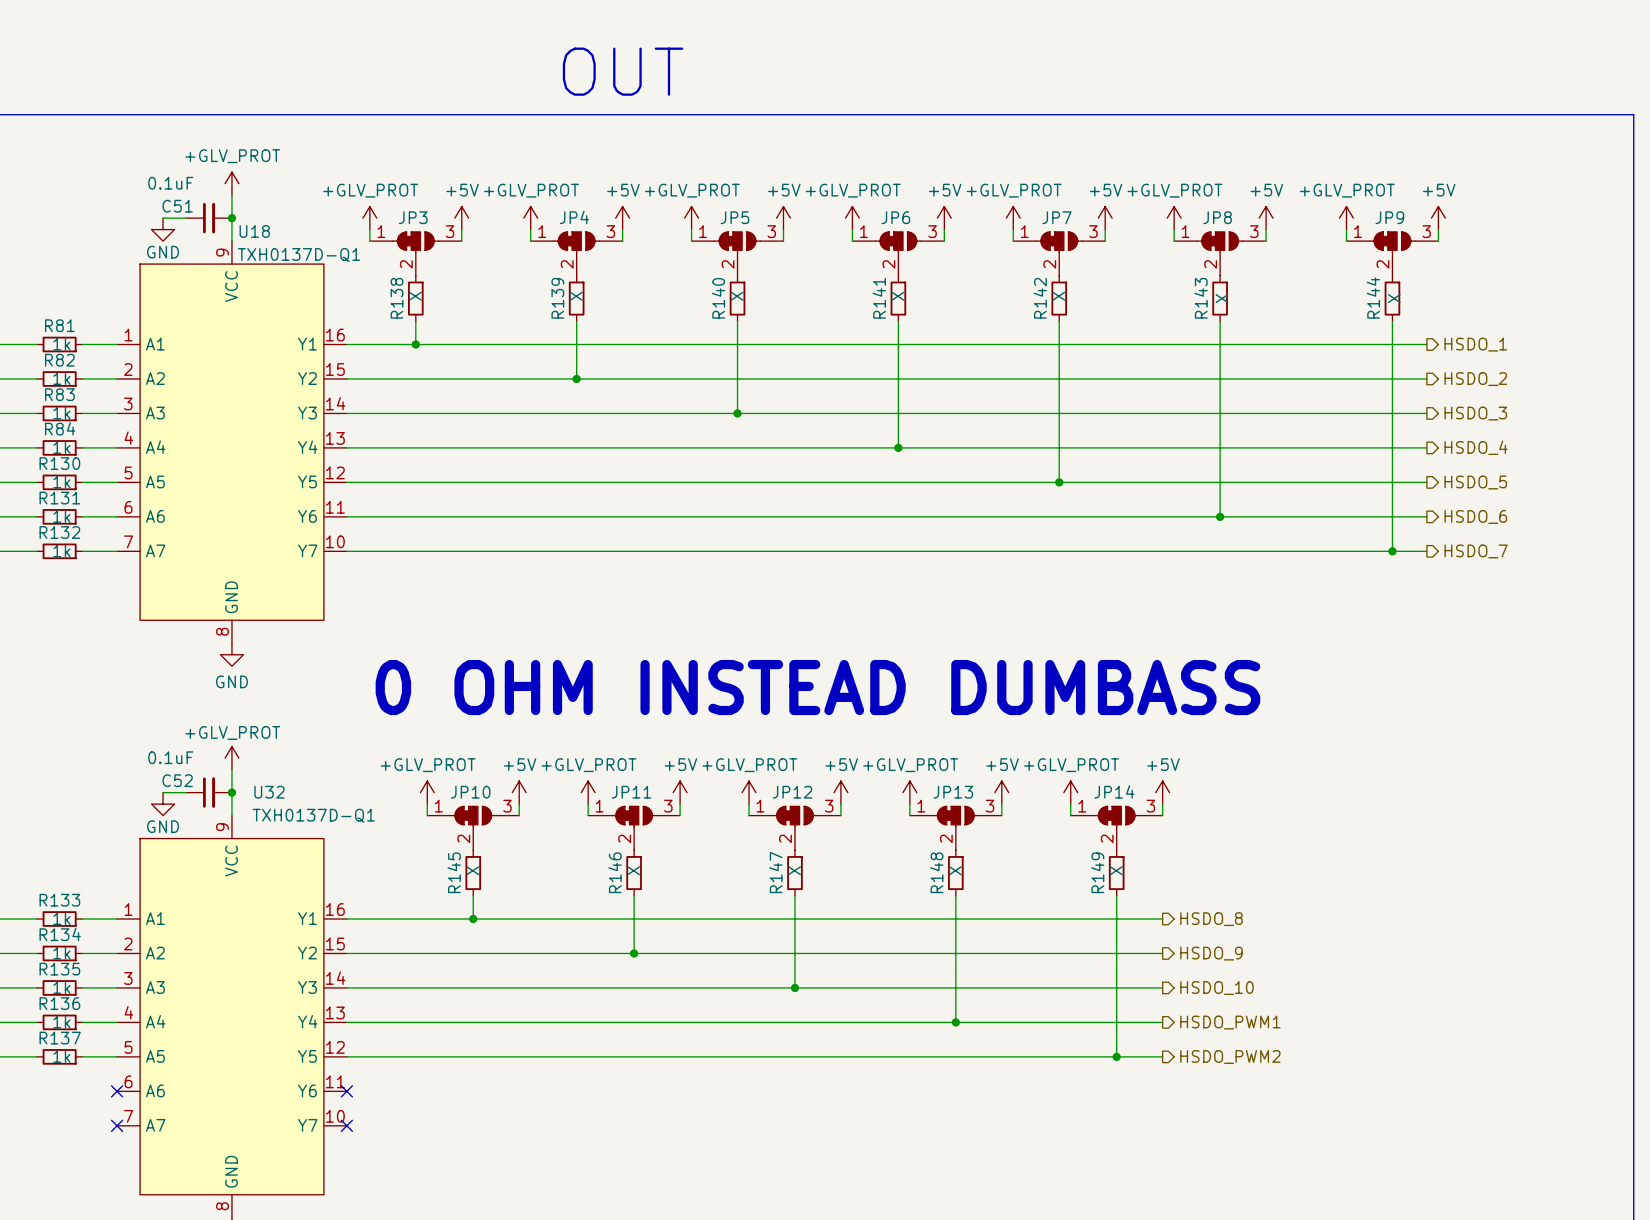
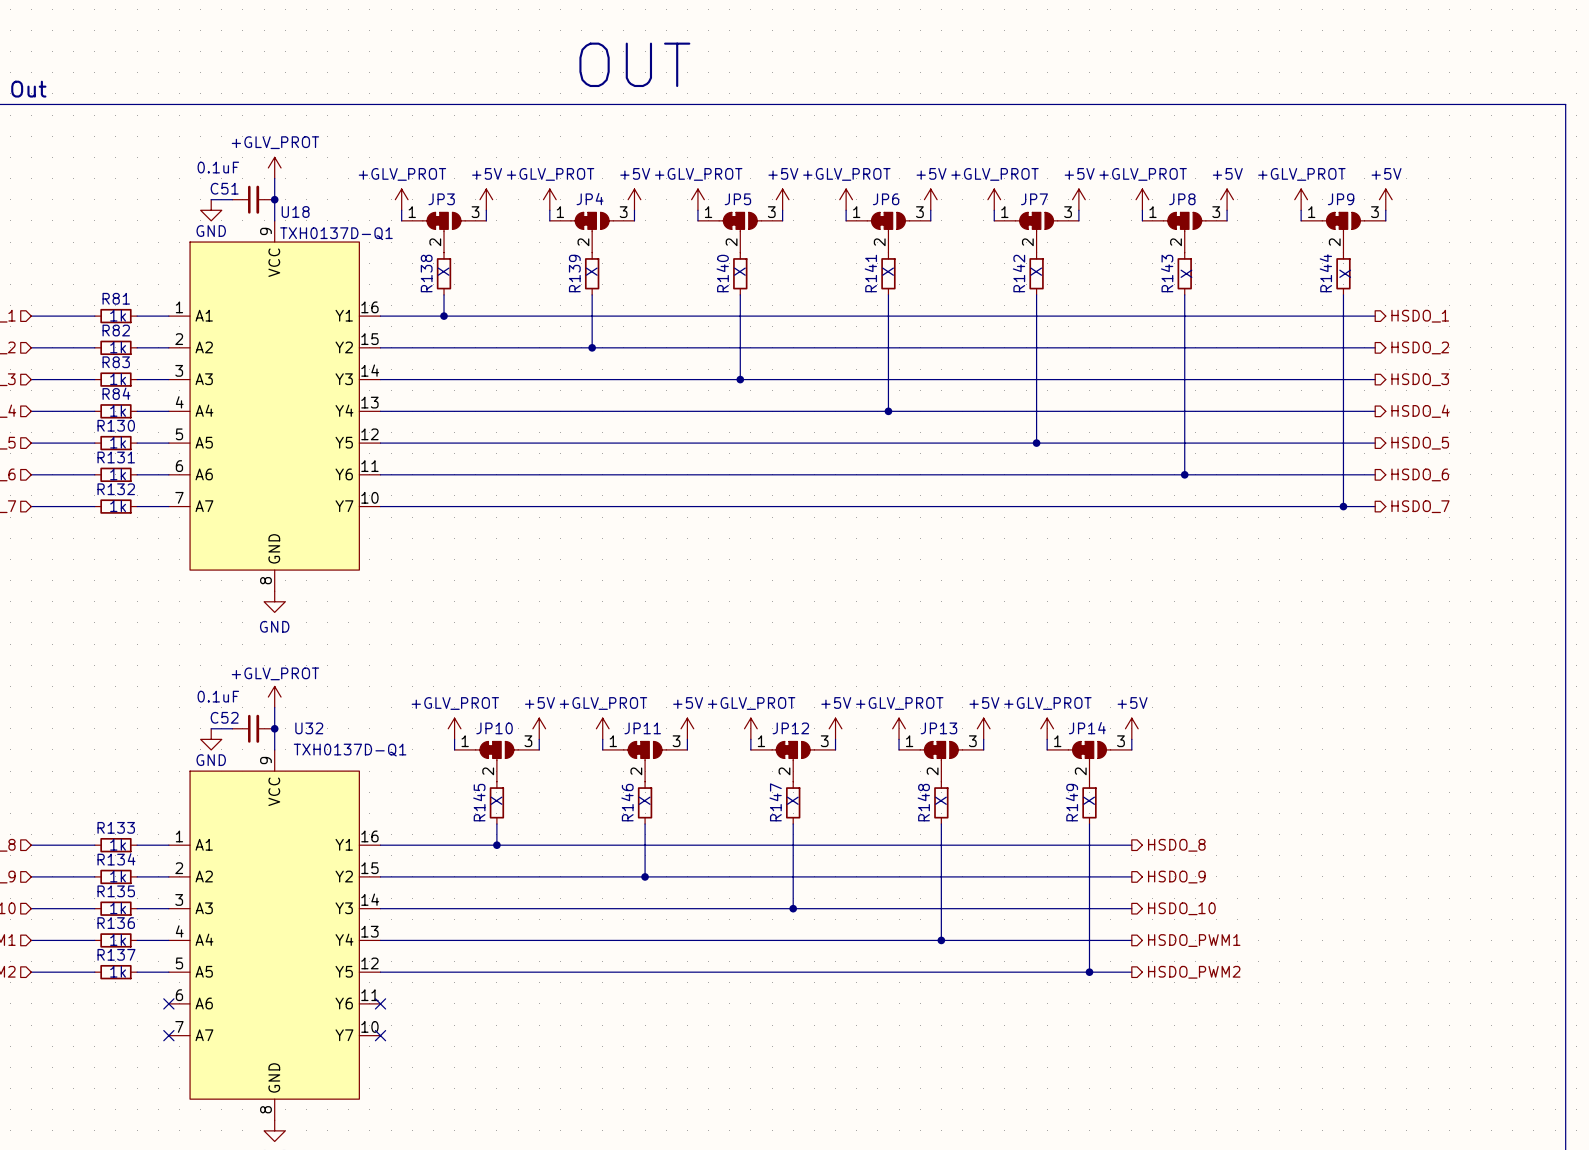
text: 0 OHM INSTEAD DUMBASS (817, 687) -> none

